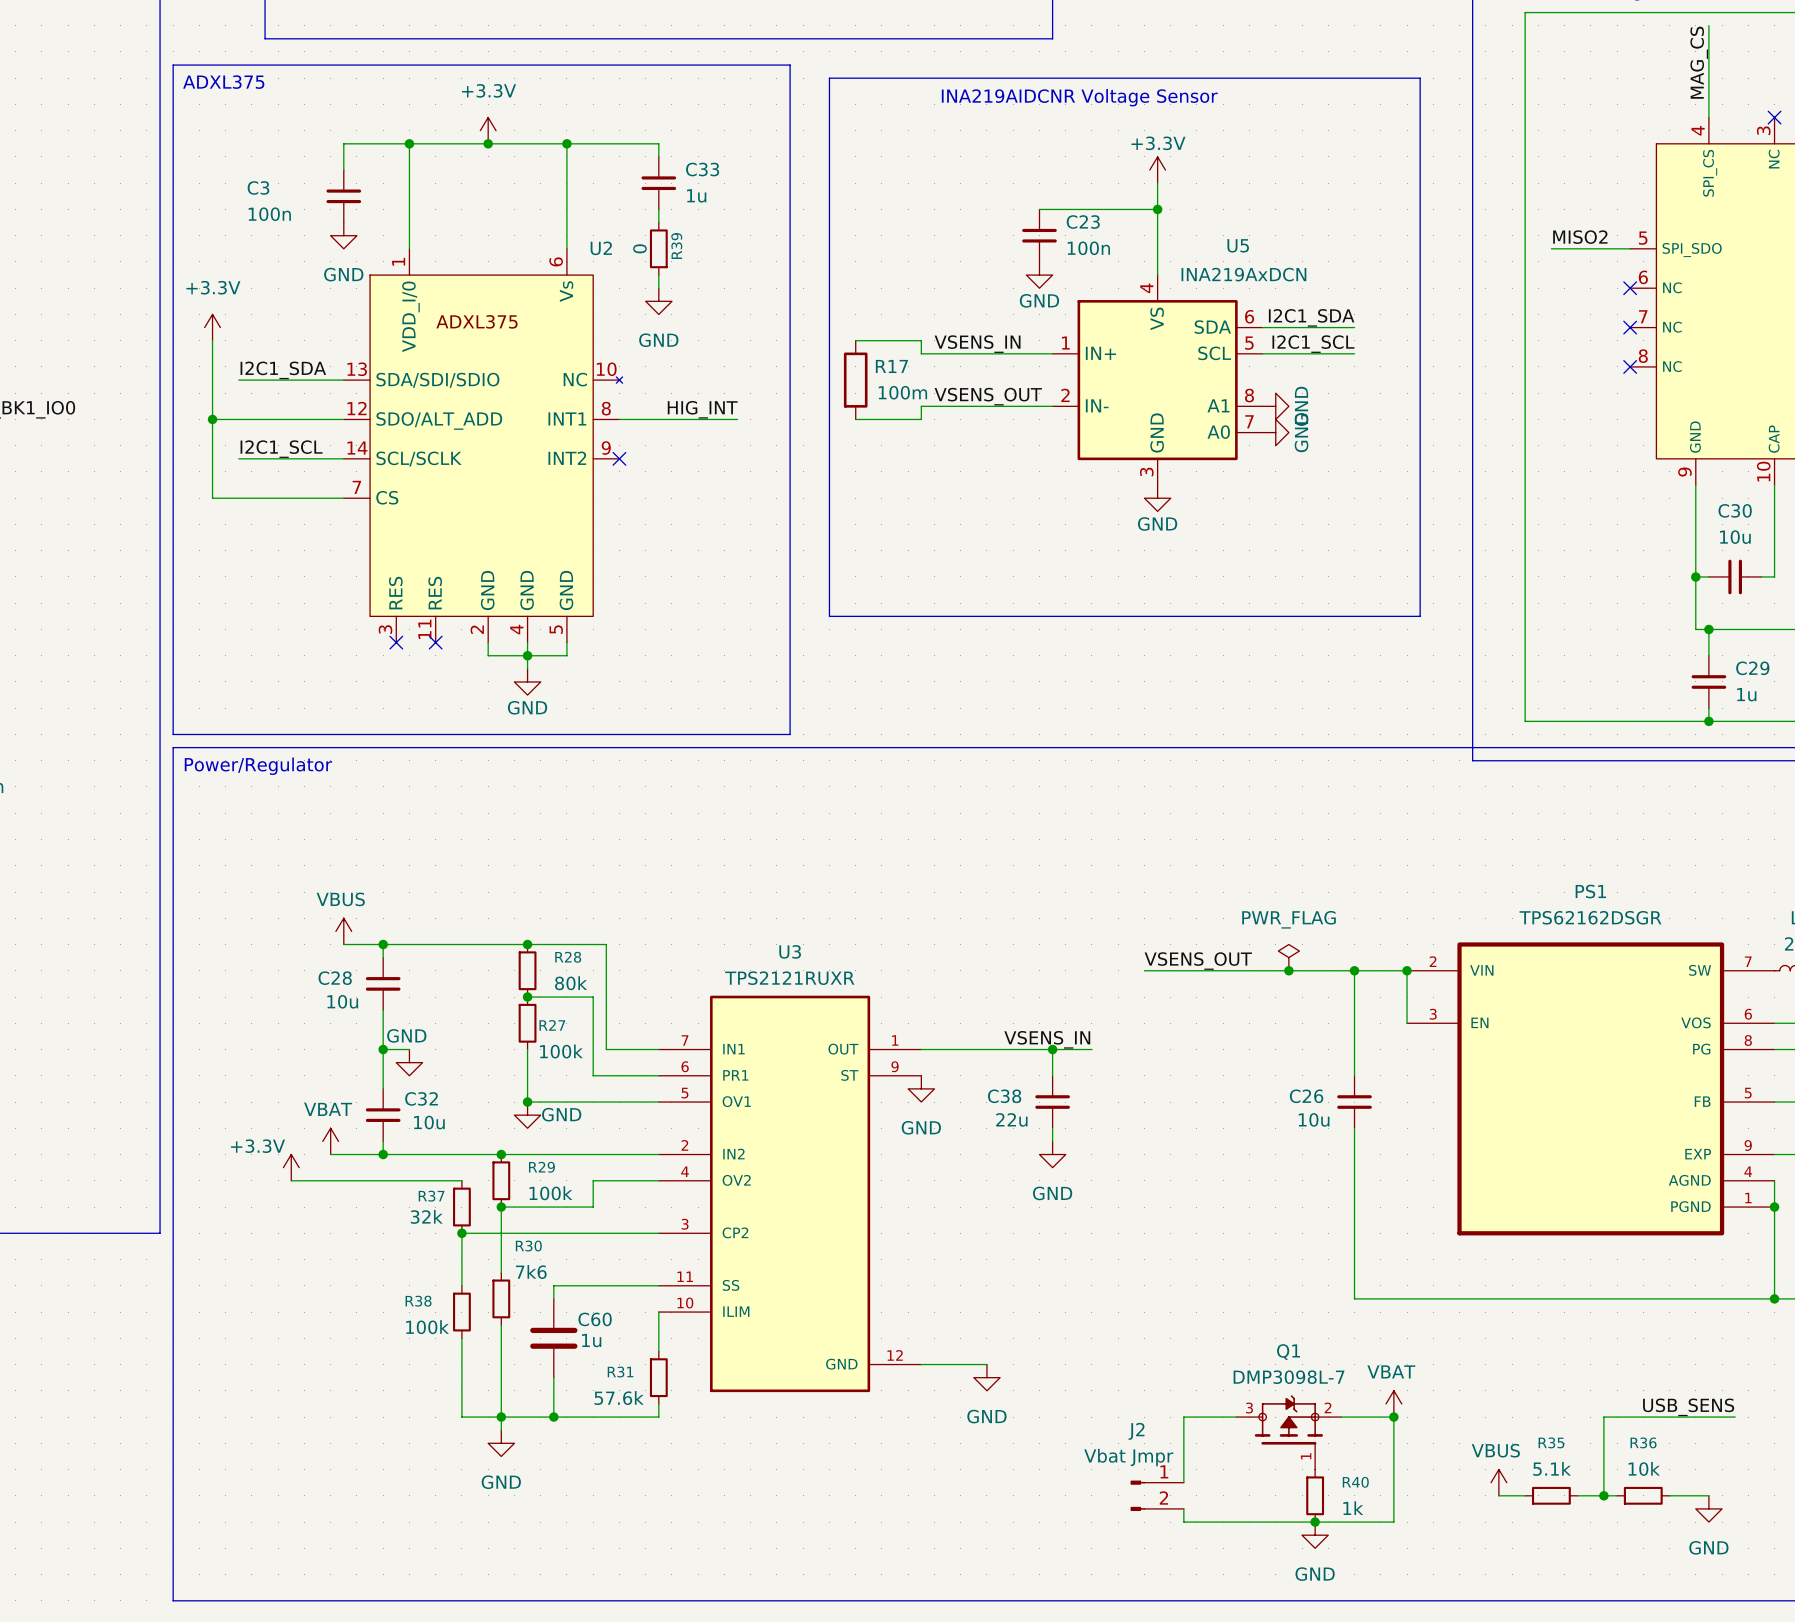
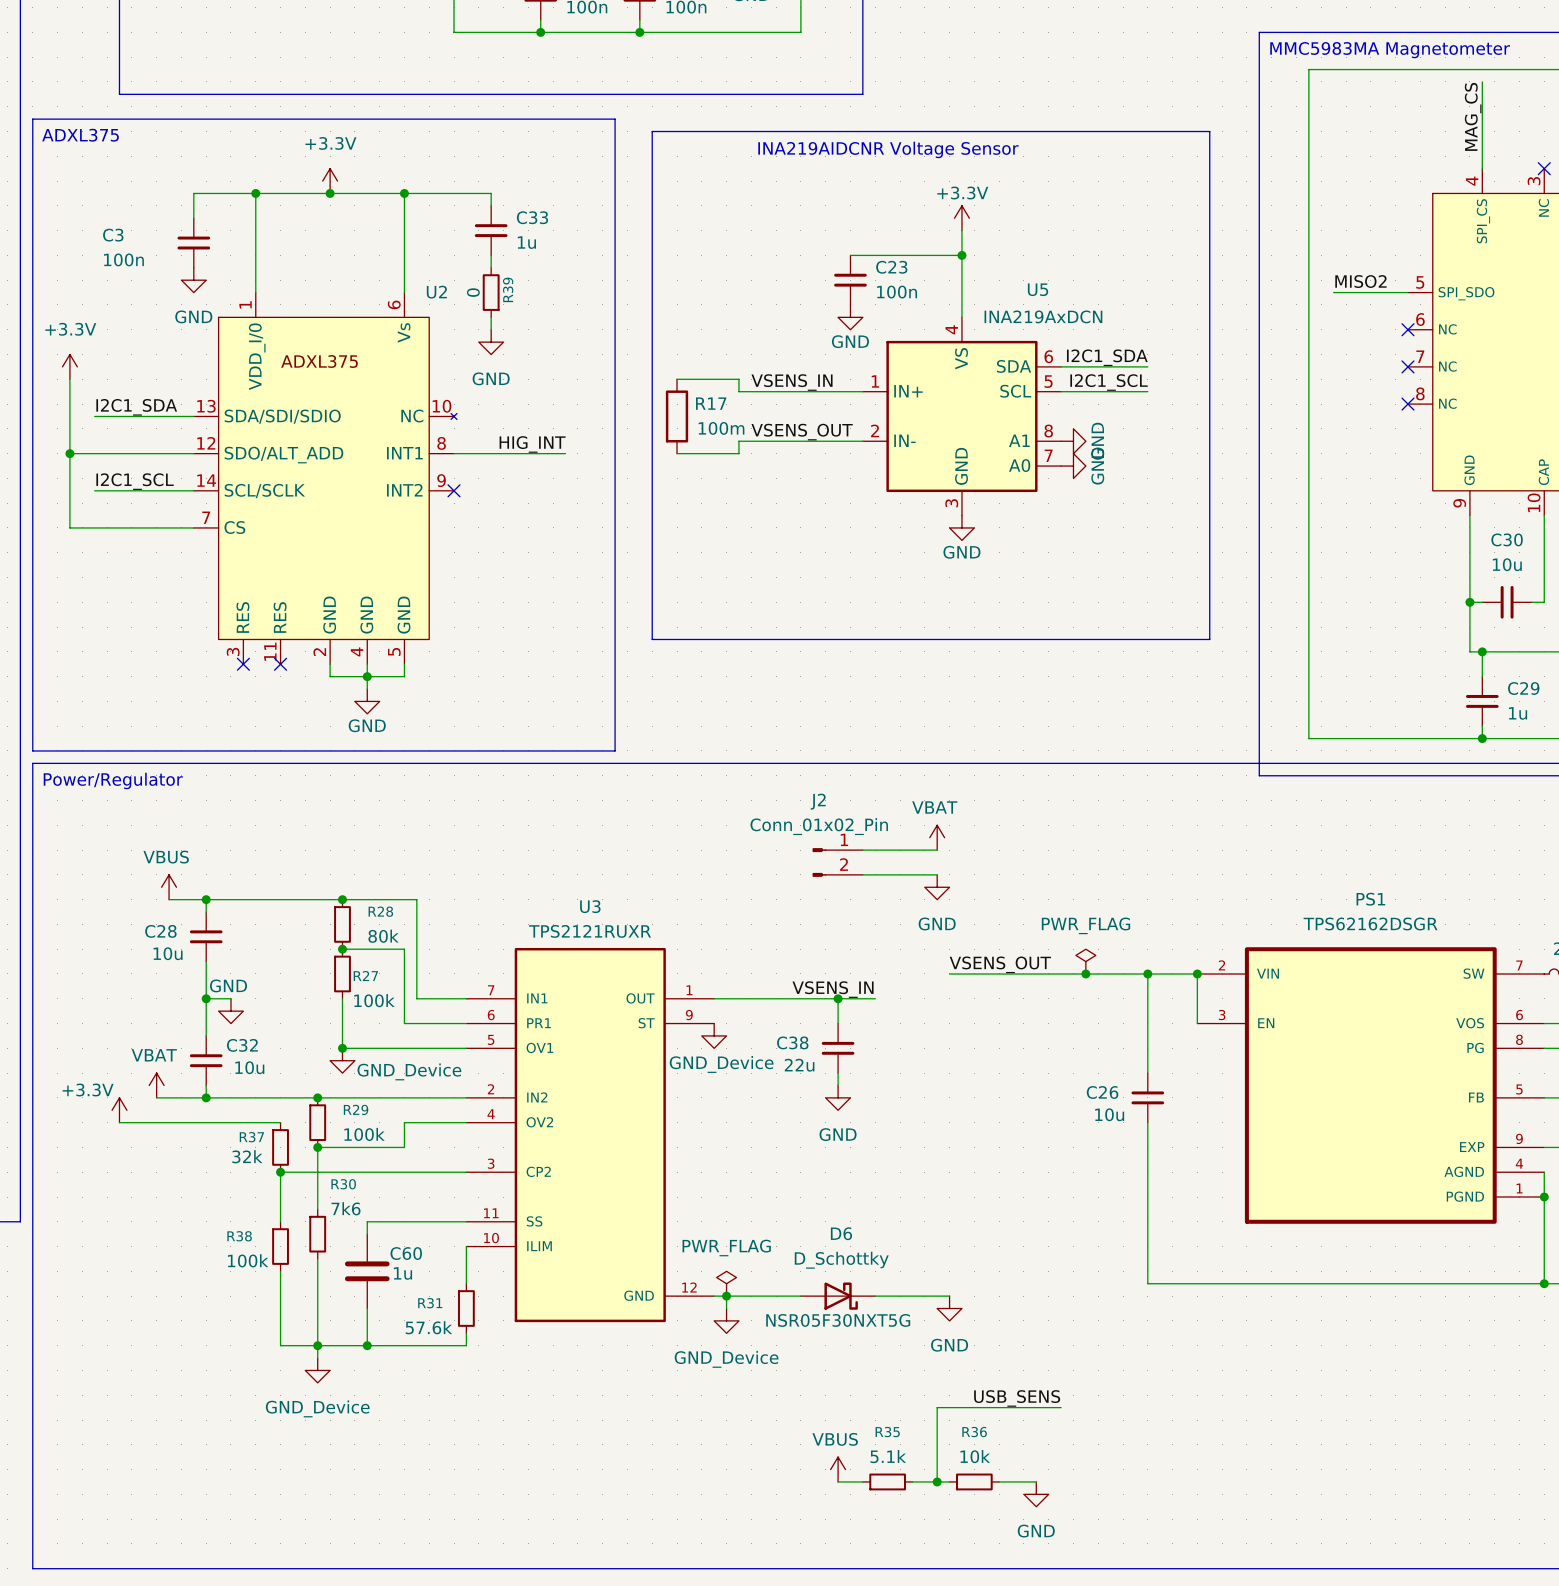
power symbol: none -> VBAT (937, 837)
wire: none -> (862, 850) (937, 850)
wire: none -> (862, 874) (937, 874)
power symbol: none -> GND (937, 887)
junction: none -> (206, 899)
junction: none -> (342, 899)
power symbol position: VBUS (343, 931) -> VBUS (169, 887)
wire: (343, 944) (501, 944) -> none
wire: (383, 944) (383, 957) -> (206, 899) (206, 912)
junction: (383, 944) -> none
junction position: (527, 944) -> (342, 949)
wire: (566, 944) (606, 944) (606, 1049) -> (404, 949) (404, 1023) (466, 1023)
R28 position: (527, 970) -> (342, 924)
C28 position: (383, 983) -> (206, 936)
junction: none -> (206, 998)
wire: none -> (342, 998) (342, 1048) (441, 1048)
wire: (527, 997) (580, 997) -> (169, 899) (416, 899) (416, 998)
junction: (527, 997) -> none
wire: (593, 997) (593, 1075) (658, 1075) -> (429, 998) (466, 998)
wire: (383, 1010) (383, 1088) -> (206, 961) (206, 1035)
R27 position: (527, 1023) -> (342, 973)
power symbol: none -> GND_Device (714, 1035)
label position: VSENS_IN (1047, 1039) -> VSENS_IN (833, 989)
wire: (383, 1049) (409, 1049) -> (206, 998) (230, 998)
junction: (383, 1049) -> none
junction: none -> (342, 1048)
wire: (527, 1049) (527, 1102) -> (156, 1097) (367, 1097)
wire: (921, 1049) (1091, 1049) -> (714, 998) (875, 998)
wire: (1052, 1049) (1052, 1075) -> (838, 998) (838, 1023)
junction position: (1052, 1049) -> (838, 998)
power symbol position: GND (409, 1062) -> GND (230, 1011)
power symbol: none -> GND_Device (342, 1060)
power symbol: GND (921, 1088) -> none
junction: none -> (206, 1097)
junction: none -> (317, 1097)
junction: (527, 1102) -> none
power symbol: none -> GND (838, 1097)
C38 position: (1052, 1102) -> (838, 1048)
C32 position: (383, 1115) -> (206, 1060)
power symbol: GND (527, 1115) -> none
wire: none -> (119, 1122) (280, 1122)
wire: (1052, 1128) (1052, 1141) -> (838, 1073) (838, 1085)
power symbol position: VBAT (330, 1141) -> VBAT (156, 1085)
wire: (383, 1141) (383, 1154) -> (206, 1085) (206, 1097)
wire: (330, 1154) (475, 1154) -> (317, 1209) (317, 1147)
junction: (383, 1154) -> none
junction position: (501, 1154) -> (317, 1147)
wire: (566, 1154) (658, 1154) -> (404, 1147) (404, 1122) (466, 1122)
power symbol: GND (1052, 1154) -> none
power symbol position: +3.3V (291, 1167) -> +3.3V (119, 1110)
wire: (291, 1180) (435, 1180) -> (280, 1221) (280, 1172)
junction: none -> (280, 1172)
R29 position: (501, 1180) -> (317, 1122)
wire: (593, 1180) (593, 1207) (501, 1207) (501, 1272) -> (429, 1172) (305, 1172)
U3 position: (790, 1193) -> (590, 1135)
R37 position: (461, 1207) -> (280, 1147)
junction: (501, 1207) -> none
junction: (461, 1233) -> none
wire: (527, 1233) (461, 1233) (461, 1285) -> (367, 1221) (367, 1234)
wire: (658, 1285) (553, 1285) (553, 1298) -> none
R30 position: (501, 1298) -> (317, 1234)
power symbol: none -> PWR_FLAG (726, 1283)
R38 position: (461, 1312) -> (280, 1246)
wire: (658, 1312) (658, 1351) -> (466, 1246) (466, 1283)
wire: none -> (714, 1296) (800, 1296)
wire: none -> (726, 1296) (726, 1308)
junction: none -> (726, 1296)
D6: none -> D_Schottky (838, 1296)
wire: none -> (875, 1296) (949, 1296)
wire: (501, 1325) (501, 1430) -> (317, 1258) (317, 1358)
power symbol: none -> GND (949, 1308)
wire: (461, 1338) (461, 1417) (658, 1417) (658, 1403) -> (280, 1271) (280, 1345) (466, 1345) (466, 1333)
C60 position: (553, 1338) -> (367, 1271)
power symbol: none -> GND_Device (726, 1320)
junction: none -> (317, 1345)
junction: none -> (367, 1345)
wire: (921, 1364) (986, 1364) -> none
wire: (553, 1377) (553, 1417) -> (367, 1308) (367, 1345)
R31 position: (658, 1377) -> (466, 1308)
power symbol: GND (986, 1377) -> none
power symbol: none -> GND_Device (317, 1370)
power symbol: VBAT (1393, 1403) -> none
label: USB_SENS (1688, 1407) -> none
junction: (501, 1417) -> none
junction: (553, 1417) -> none
wire: (1236, 1417) (1183, 1417) (1183, 1482) -> none
wire: (1341, 1417) (1393, 1417) (1393, 1522) (1183, 1522) (1183, 1508) -> none
junction: (1393, 1417) -> none
wire: (1735, 1417) (1603, 1417) (1603, 1495) -> none
label: none -> USB_SENS (1017, 1398)
wire: none -> (1061, 1407) (937, 1407) (937, 1481)
Q1: DMP3098L-7 (1288, 1432) -> none
power symbol: GND (501, 1443) -> none
J2 value: Vbat Jmpr (1128, 1457) -> Conn_01x02_Pin (819, 826)
power symbol: VBUS (1498, 1482) -> none
power symbol: none -> VBUS (838, 1469)
J2 position: (1157, 1495) -> (837, 862)
R40: 1k (1315, 1495) -> none
wire: (1498, 1495) (1525, 1495) -> none
R35 position: (1551, 1495) -> (887, 1481)
wire: (1577, 1495) (1617, 1495) -> none
junction: (1603, 1495) -> none
R36 position: (1643, 1495) -> (974, 1481)
wire: (1669, 1495) (1708, 1495) -> none
wire: none -> (838, 1481) (862, 1481)
wire: none -> (912, 1481) (949, 1481)
junction: none -> (937, 1481)
wire: none -> (999, 1481) (1036, 1481)
power symbol: GND (1708, 1508) -> none
junction: (1315, 1522) -> none
power symbol position: GND (1315, 1535) -> GND (1036, 1494)

